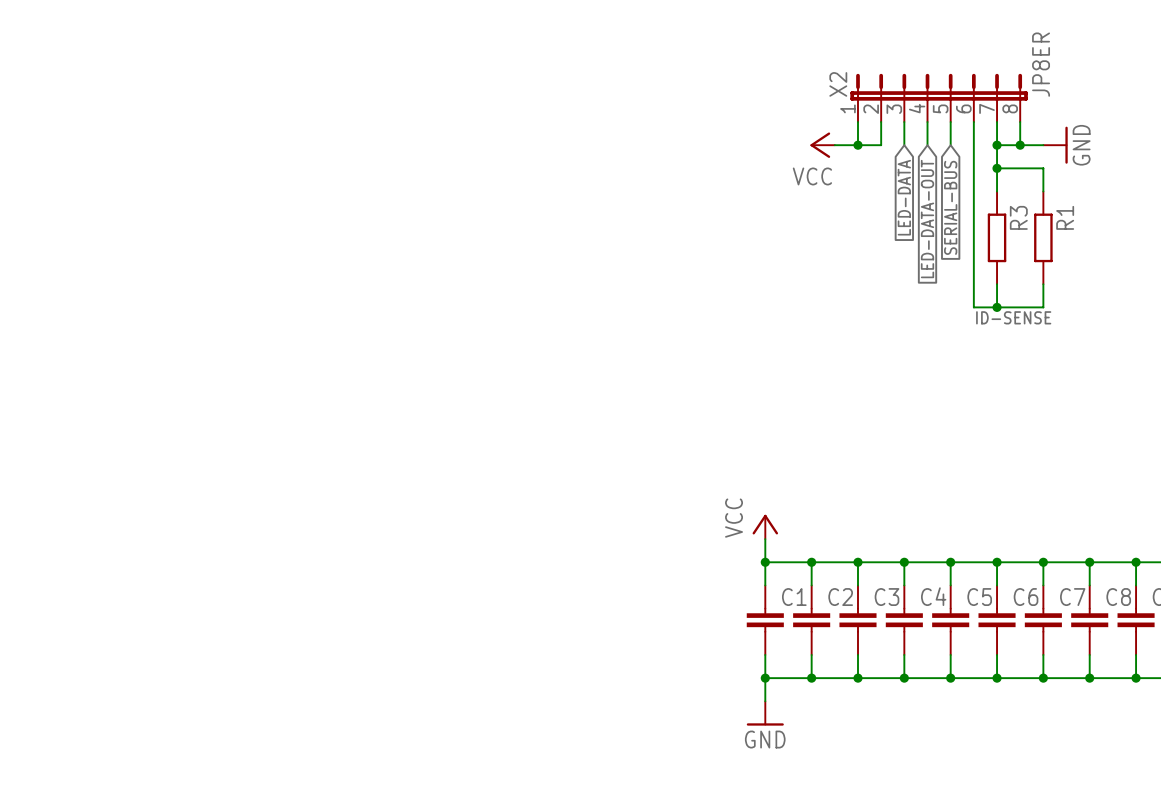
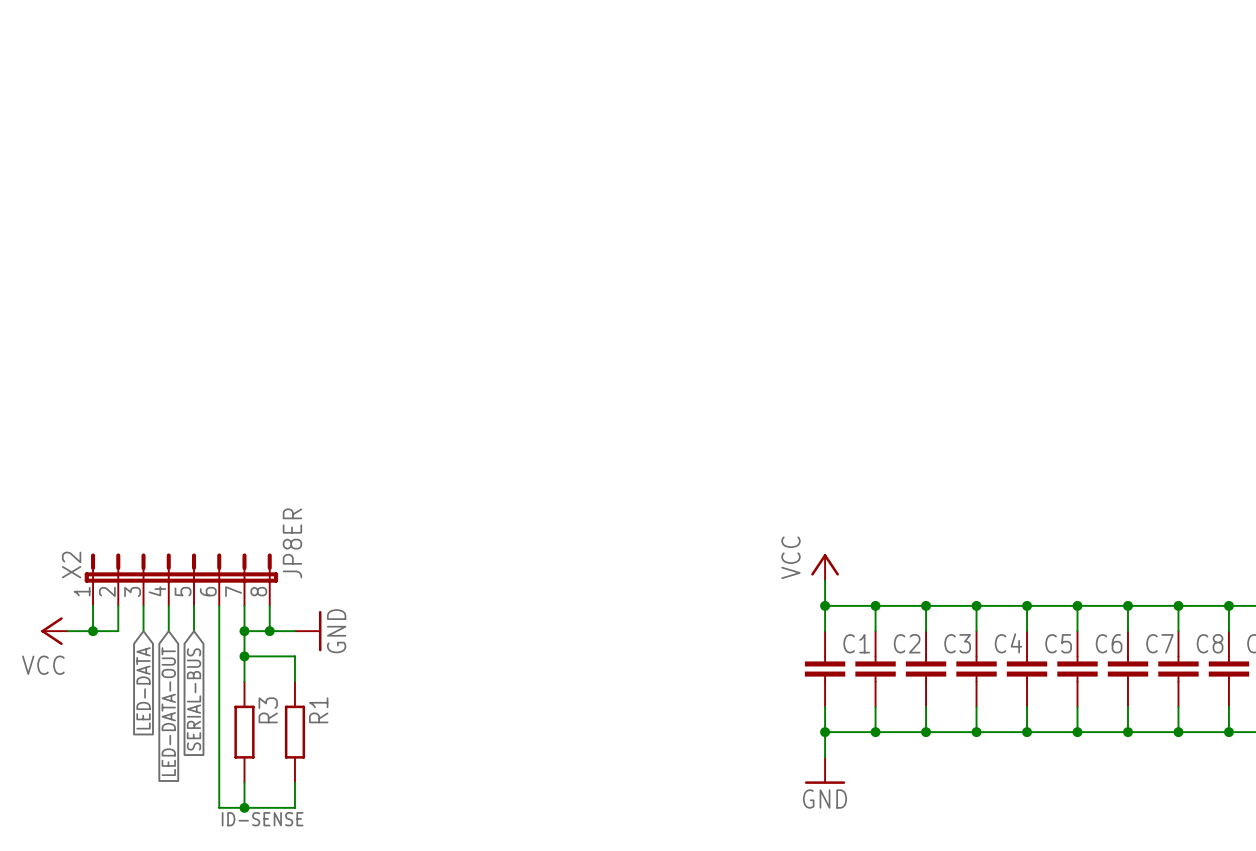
X2 position: (939, 97) -> (181, 579)
wire: (857, 122) (857, 145) -> none
wire: (881, 122) (881, 145) (834, 145) -> none
wire: (904, 122) (904, 145) -> none
wire: (927, 122) (927, 145) -> none
wire: (950, 122) (950, 145) -> none
wire: (973, 122) (973, 307) (1043, 307) (1043, 284) -> none
wire: (997, 122) (997, 191) -> none
wire: (1020, 122) (1020, 145) -> none
power symbol: VCC (822, 145) -> none
junction: (857, 145) -> none
wire: (997, 145) (1043, 145) -> none
junction: (997, 145) -> none
junction: (1020, 145) -> none
power symbol: GND (1055, 145) -> none
wire: (997, 168) (1043, 168) (1043, 191) -> none
junction: (997, 168) -> none
global label: LED-DATA (904, 197) -> none
global label: SERIAL-BUS (950, 207) -> none
global label: LED-DATA-OUT (927, 219) -> none
R3 position: (997, 237) -> (244, 732)
R1 position: (1043, 237) -> (294, 732)
wire: (997, 284) (997, 307) -> none
junction: (997, 307) -> none
label: ID-SENSE (1013, 317) -> none
wire: none -> (93, 605) (93, 631)
wire: none -> (118, 605) (118, 631) (67, 631)
wire: none -> (143, 605) (143, 631)
wire: none -> (168, 605) (168, 631)
wire: none -> (194, 605) (194, 631)
wire: none -> (219, 605) (219, 807) (294, 807) (294, 782)
wire: none -> (244, 605) (244, 681)
wire: none -> (269, 605) (269, 631)
power symbol: none -> VCC (54, 631)
junction: none -> (93, 631)
wire: none -> (244, 631) (294, 631)
junction: none -> (244, 631)
junction: none -> (269, 631)
power symbol: none -> GND (308, 631)
wire: none -> (244, 656) (294, 656) (294, 681)
junction: none -> (244, 656)
global label: none -> LED-DATA (143, 688)
global label: none -> SERIAL-BUS (194, 699)
global label: none -> LED-DATA-OUT (168, 711)
wire: none -> (244, 782) (244, 807)
junction: none -> (244, 807)
label: none -> ID-SENSE (262, 819)

